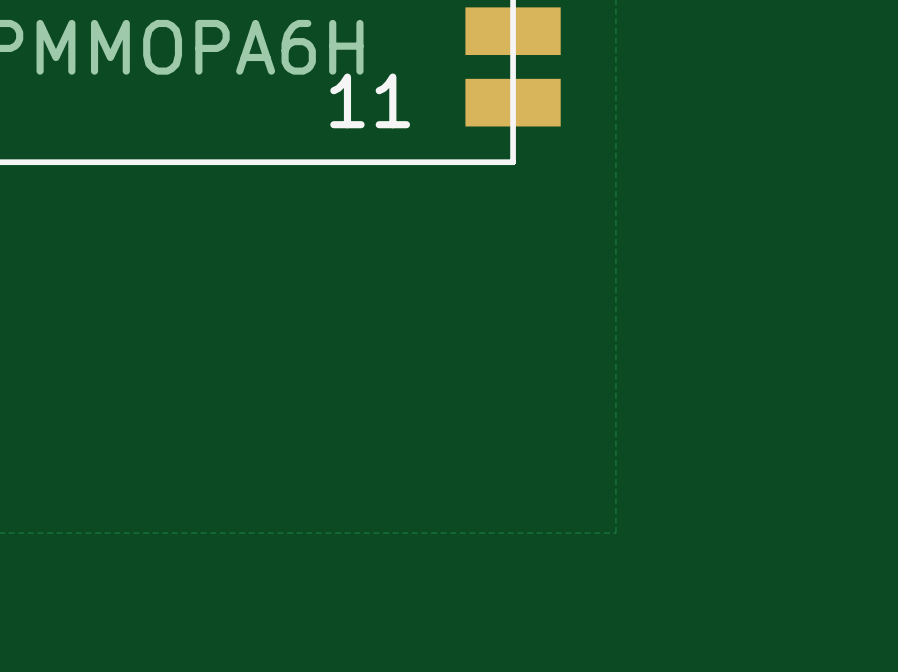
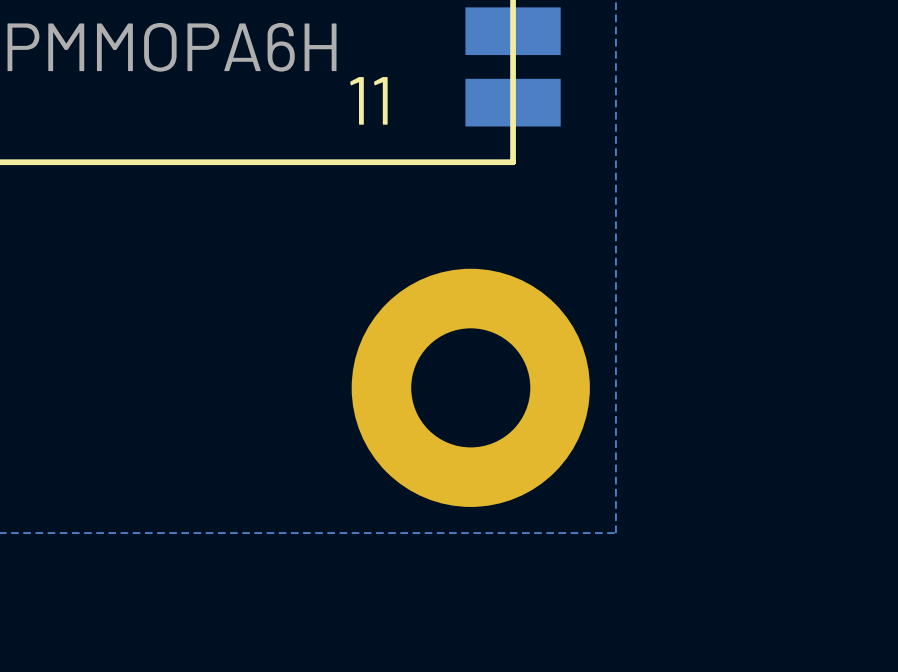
part: none -> (470, 387)

